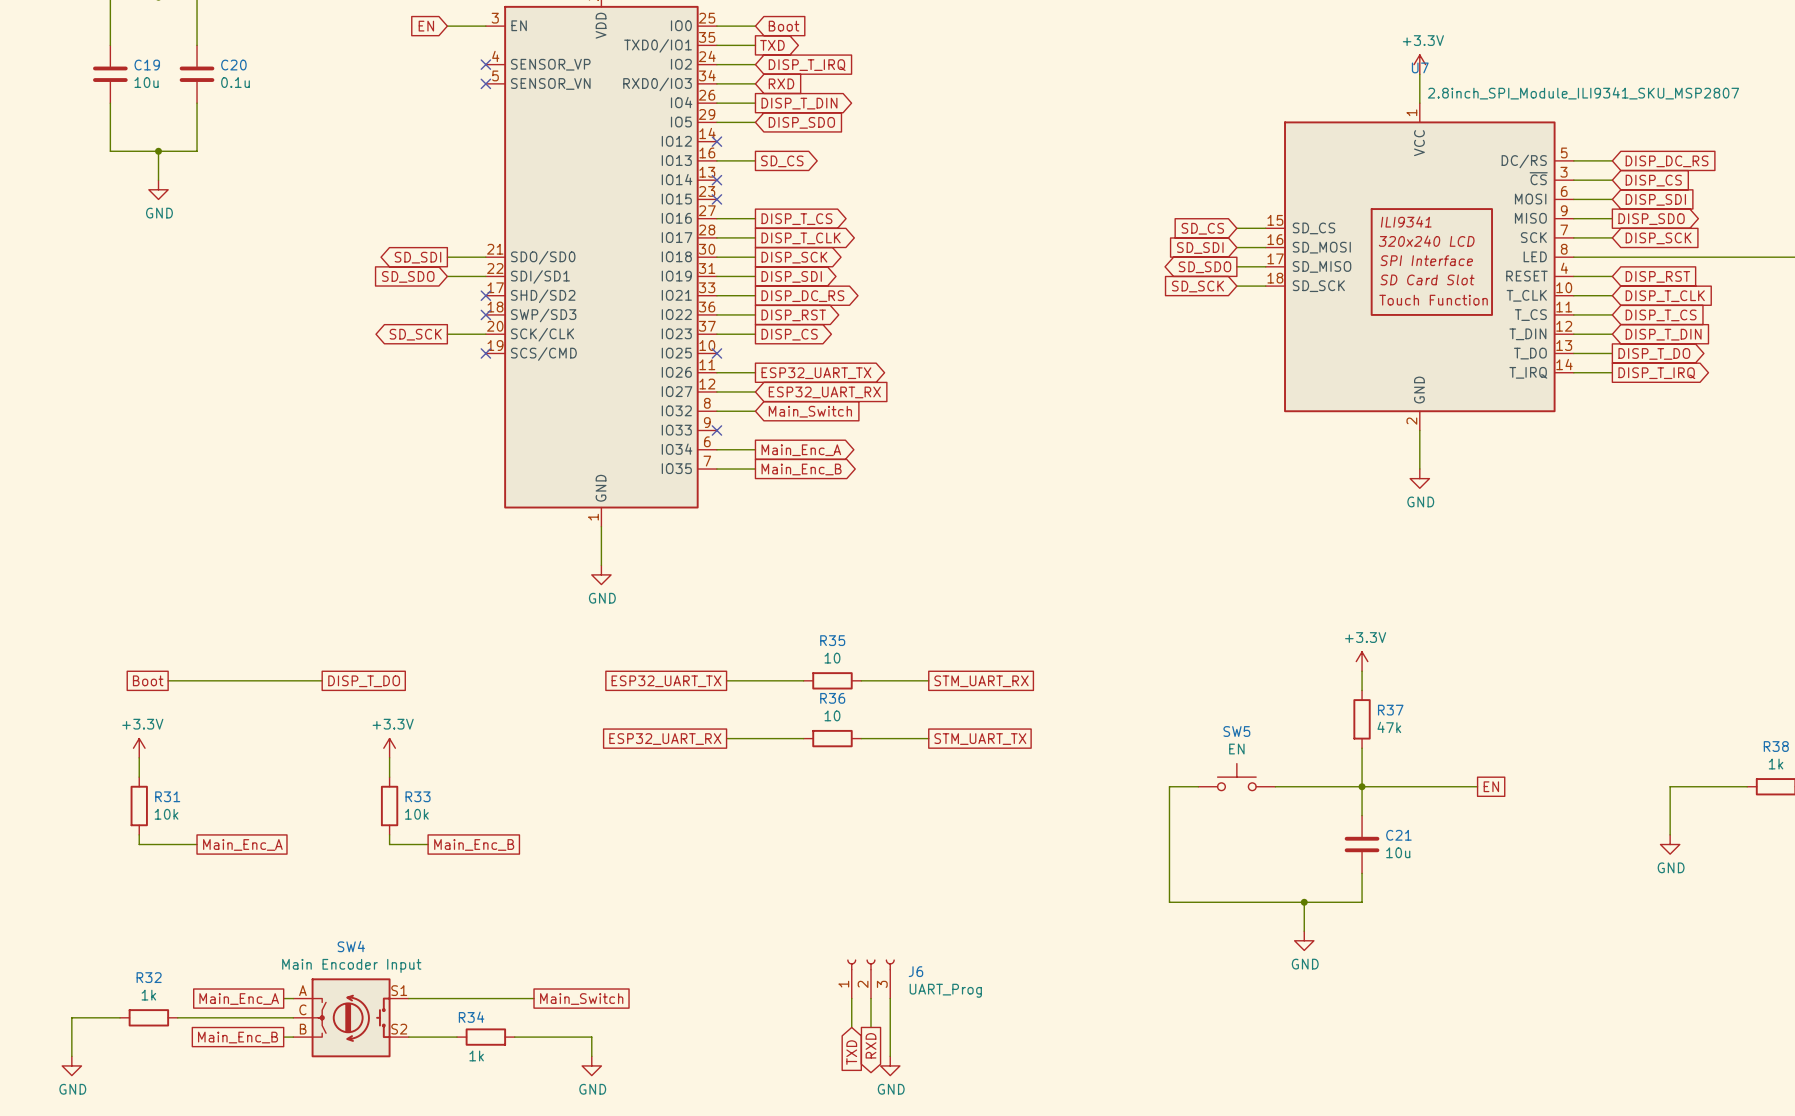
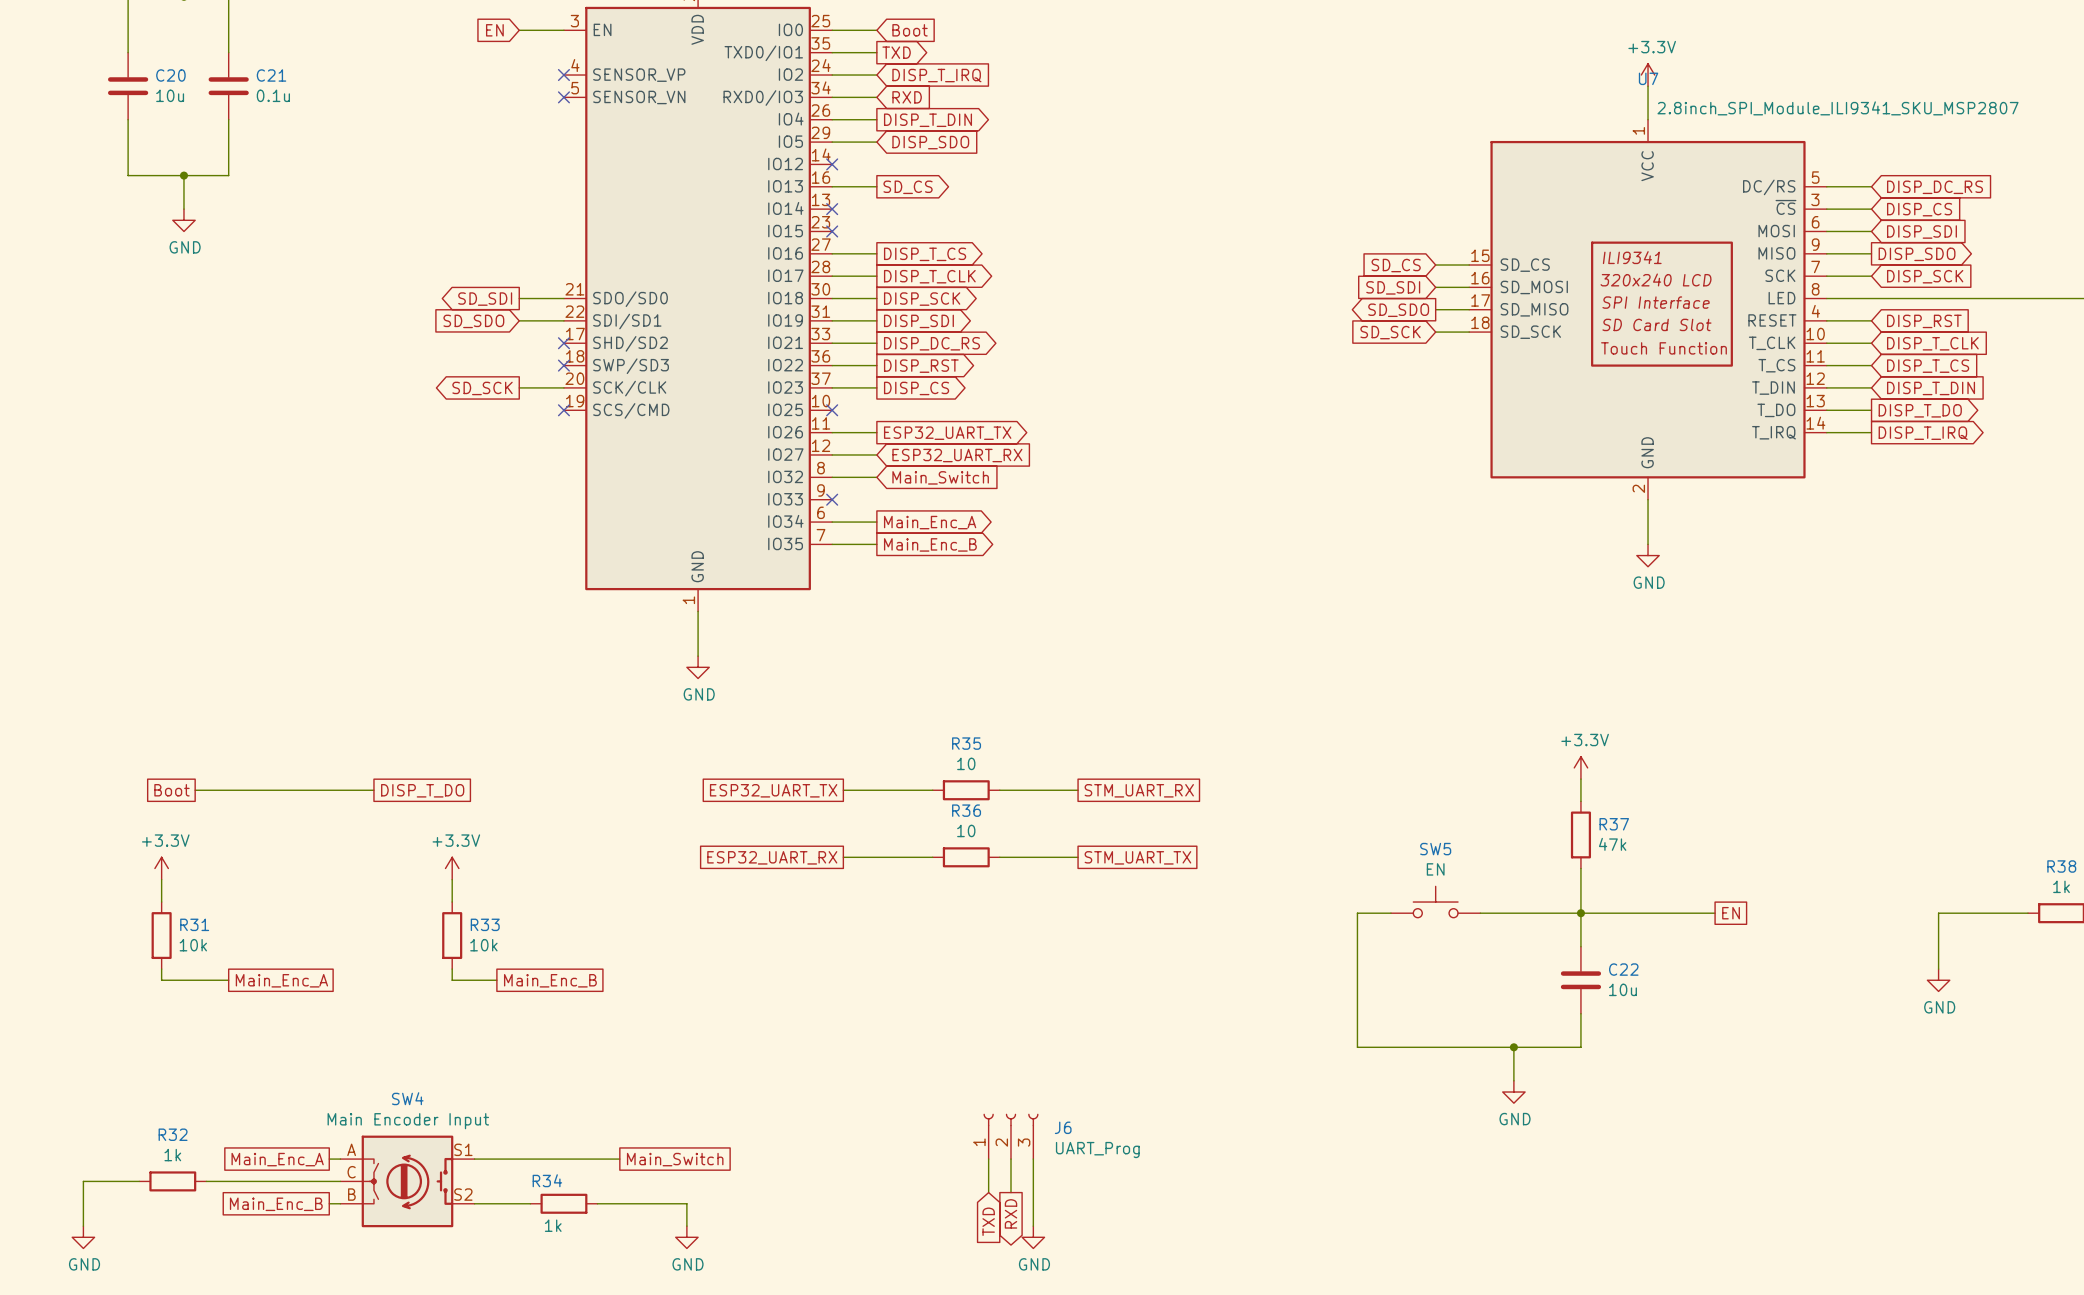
C19 name: C19 (147, 65) -> C20 (170, 75)
C20 name: C20 (233, 65) -> C21 (271, 75)
C21 name: C21 (1398, 835) -> C22 (1623, 969)

